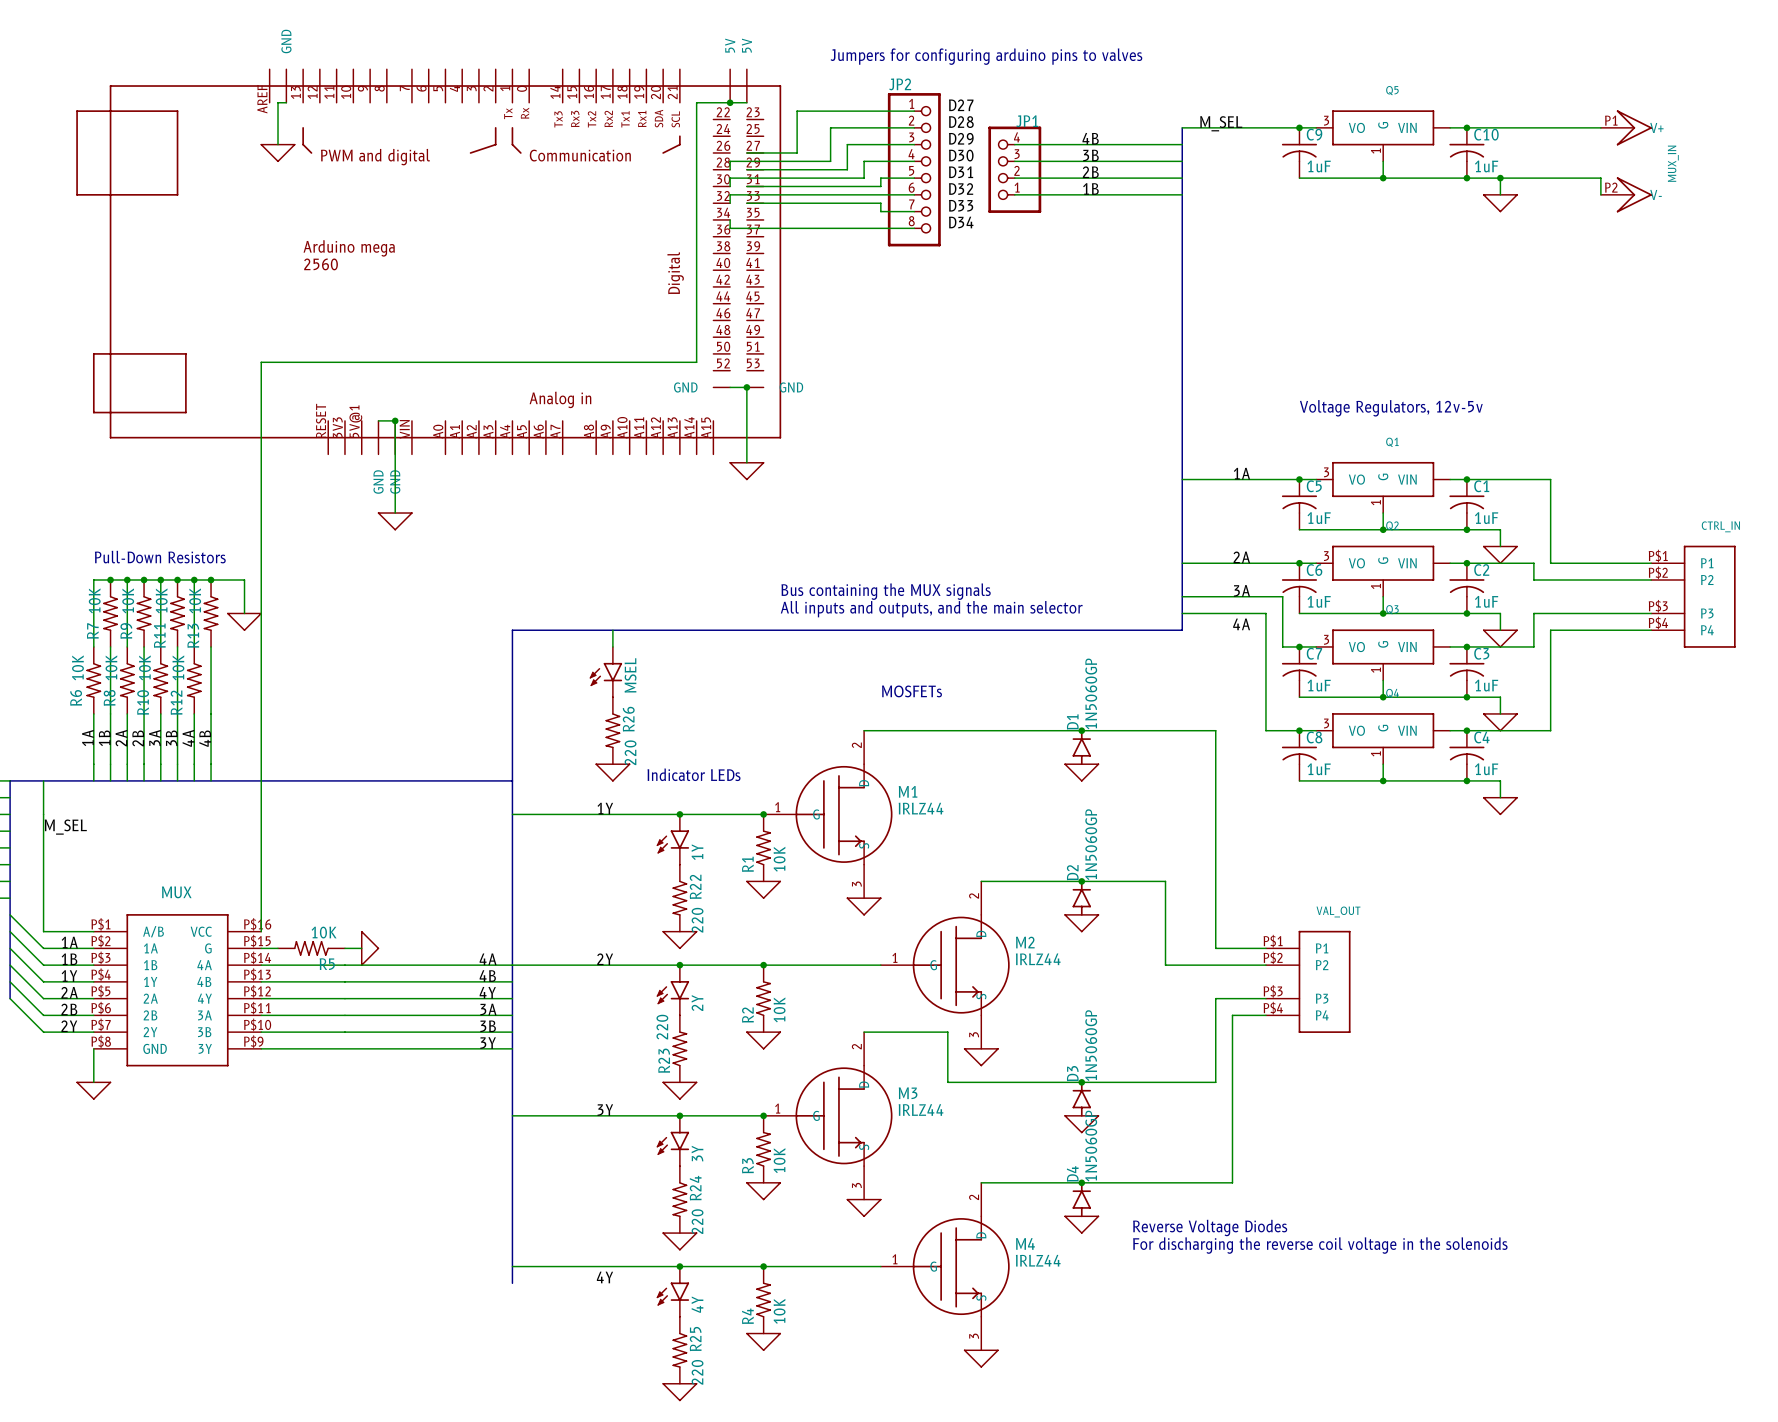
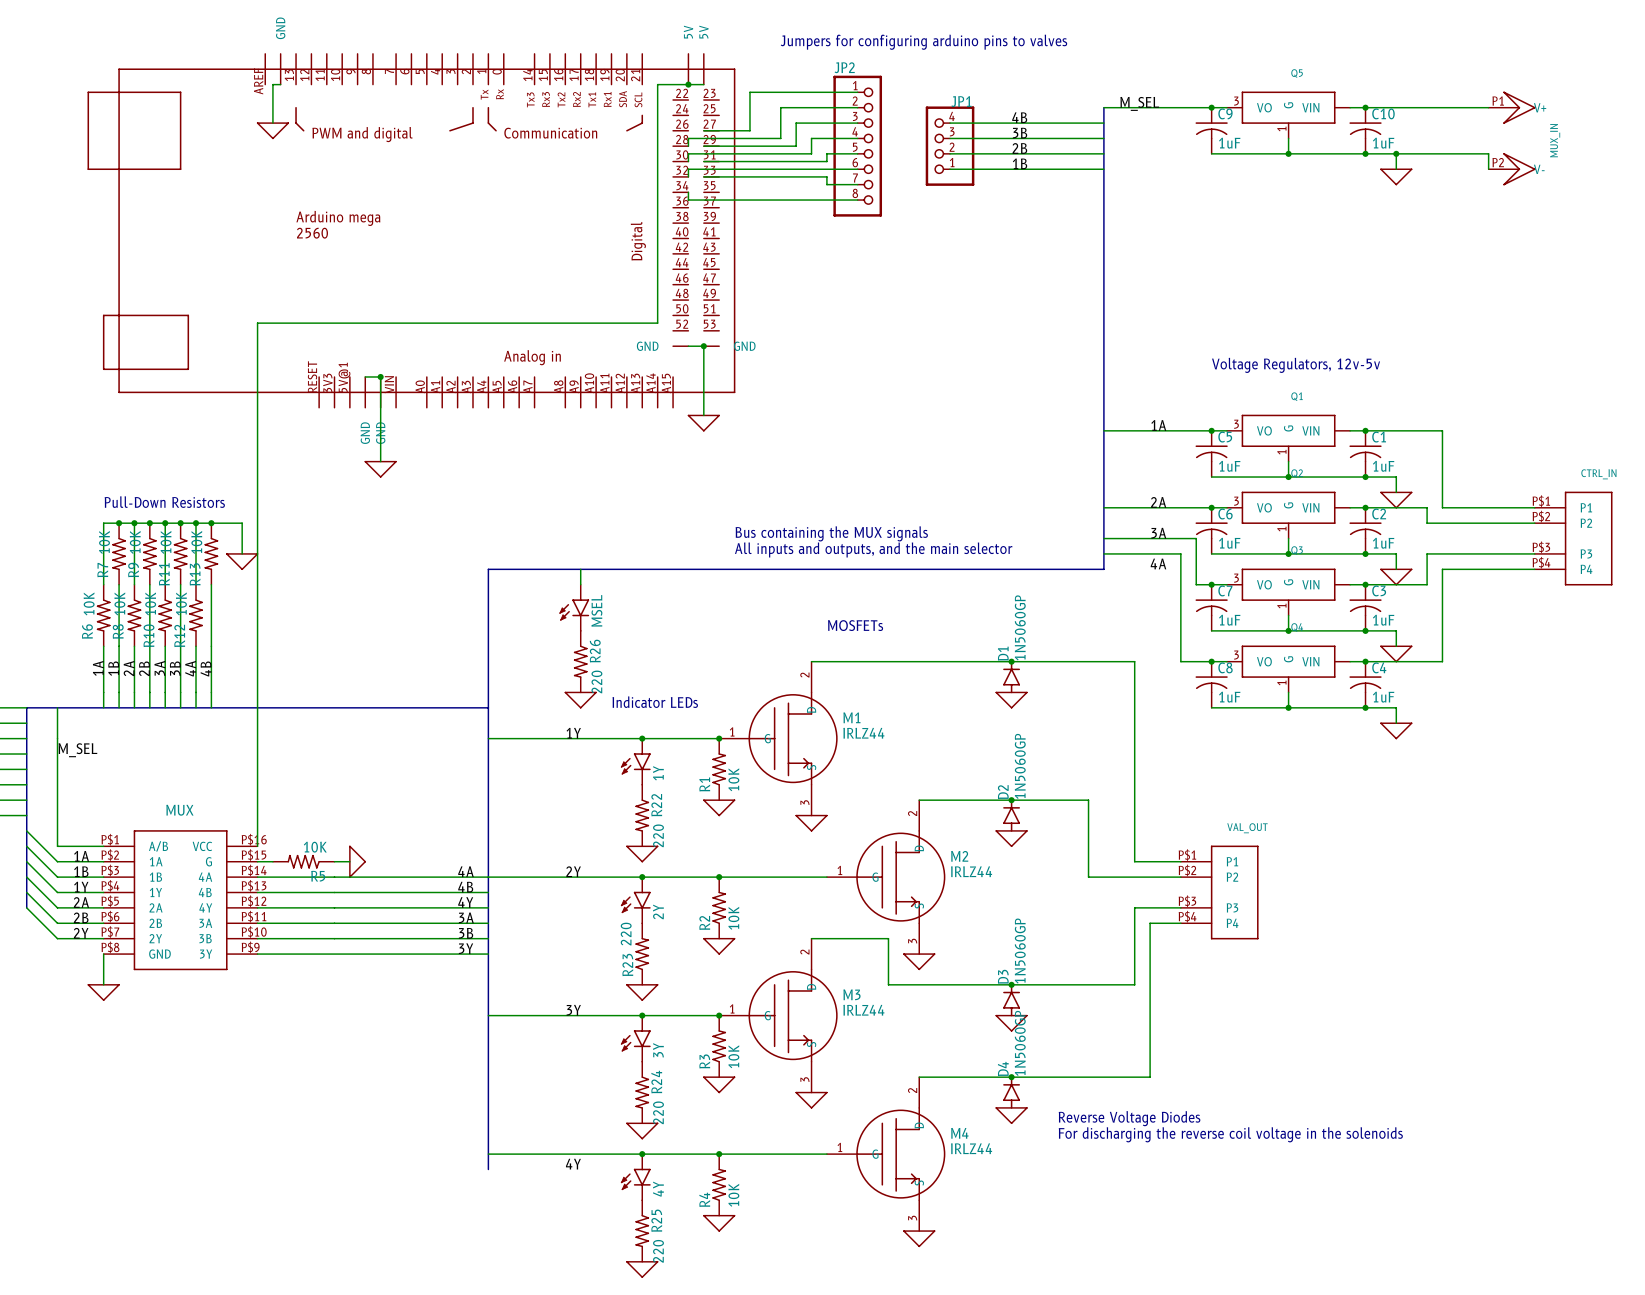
label: D27 (961, 105) -> none
label: D28 (961, 122) -> none
label: D29 (961, 138) -> none
label: D30 (961, 155) -> none
label: D31 (961, 172) -> none
label: D32 (961, 189) -> none
label: D33 (961, 205) -> none
label: D34 (961, 222) -> none

